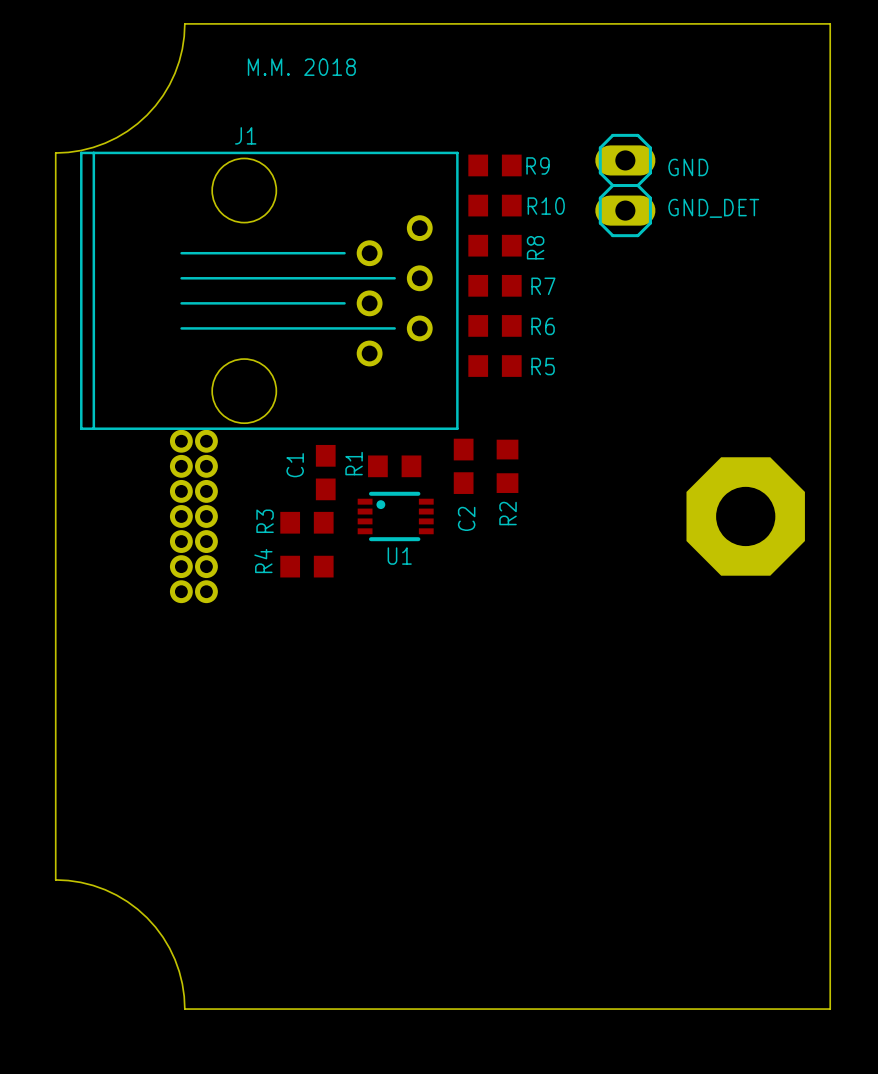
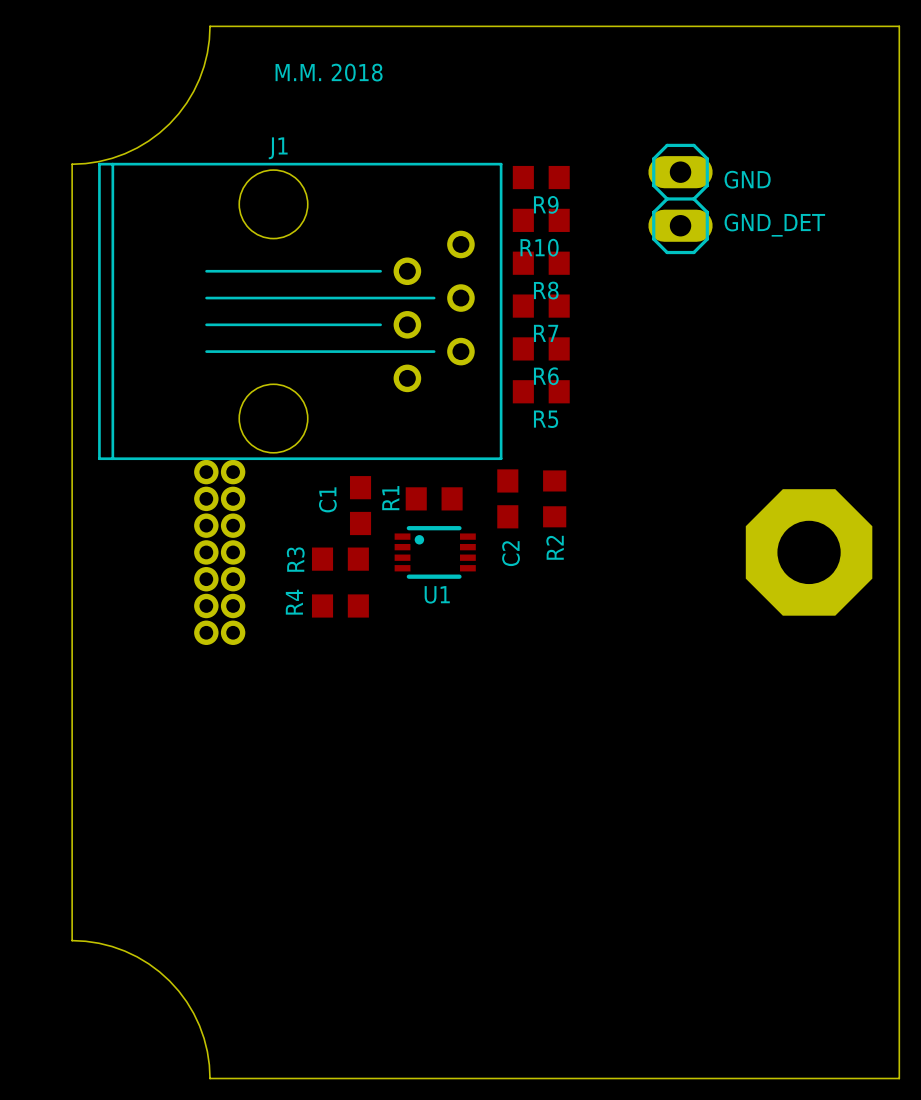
R9 name position: R9 (538, 165) -> R9 (546, 204)
R10 name position: R10 (546, 206) -> R10 (539, 247)
R8 name rotation: 0° (535, 247) -> 90° clockwise (546, 290)
R8 name position: R8 (535, 247) -> R8 (546, 290)
R7 name position: R7 (543, 286) -> R7 (546, 333)
R6 name position: R6 (543, 326) -> R6 (546, 376)
R5 name position: R5 (543, 366) -> R5 (546, 419)

